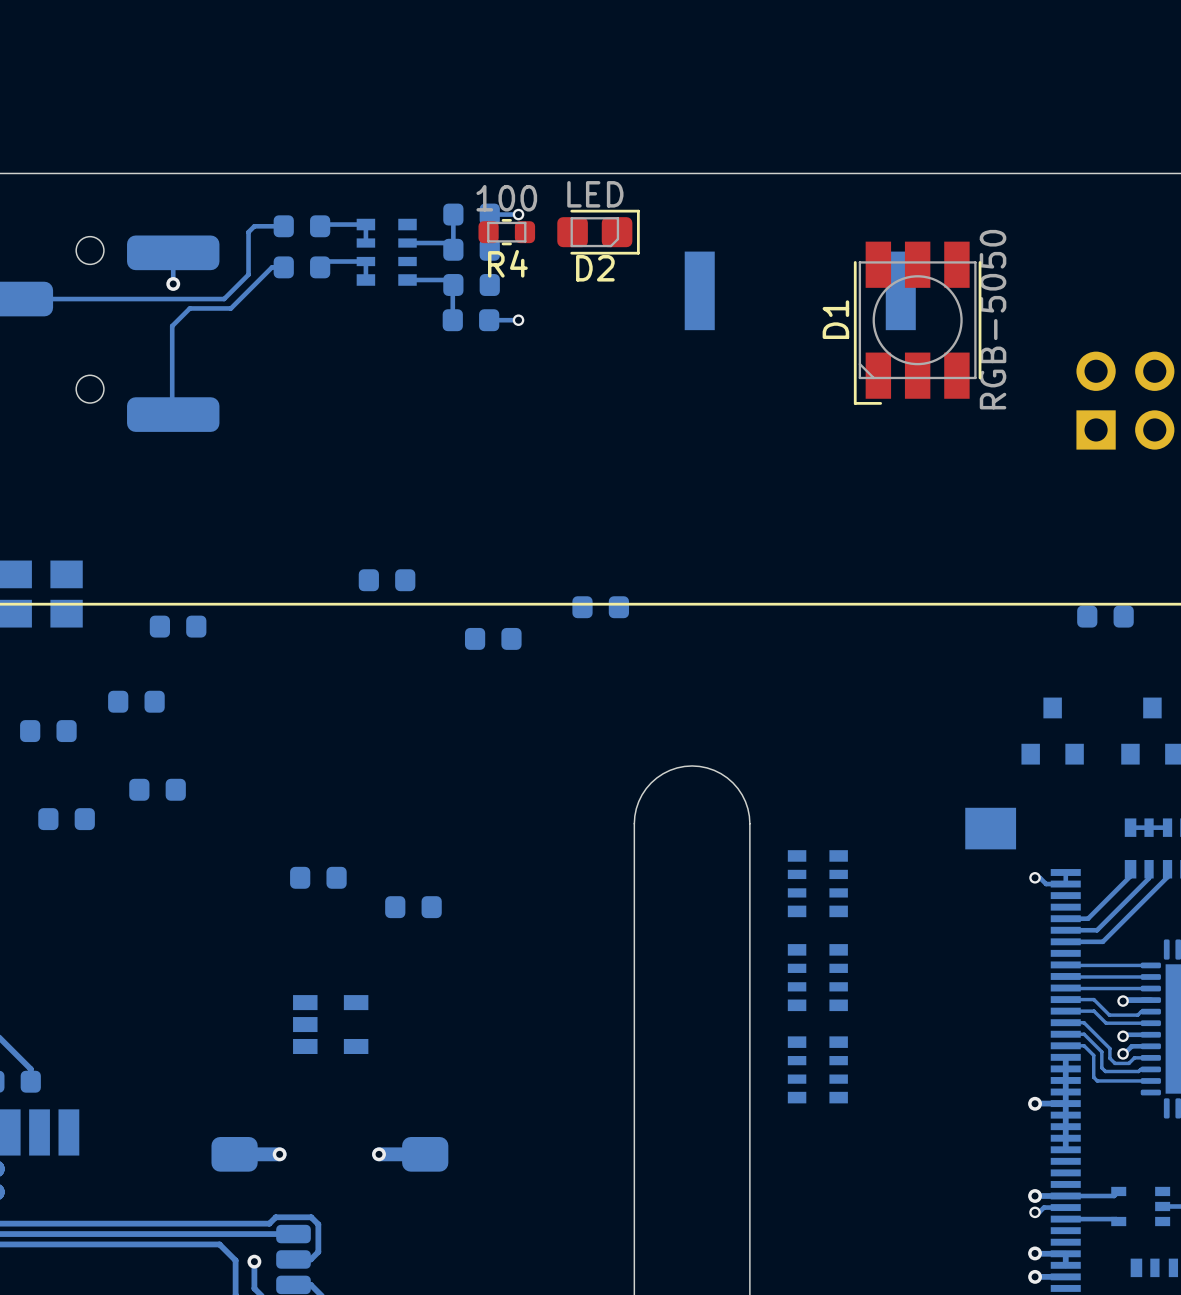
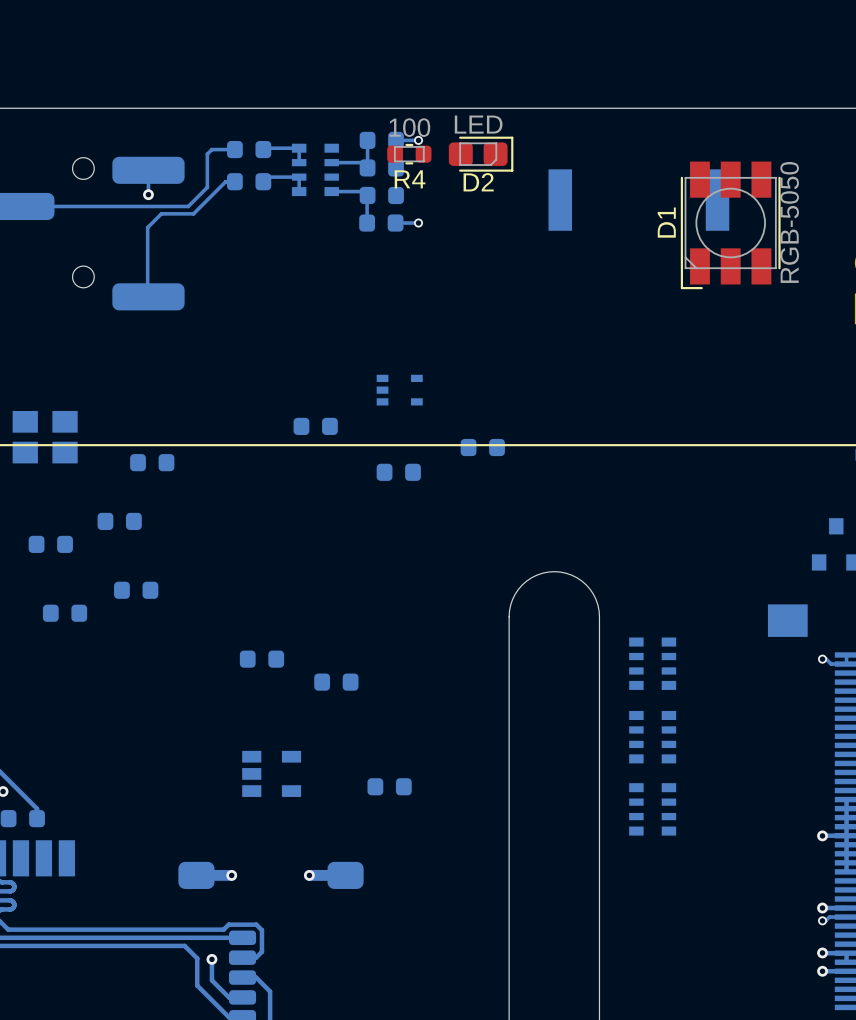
part: none -> (399, 390)
part: none -> (389, 786)

